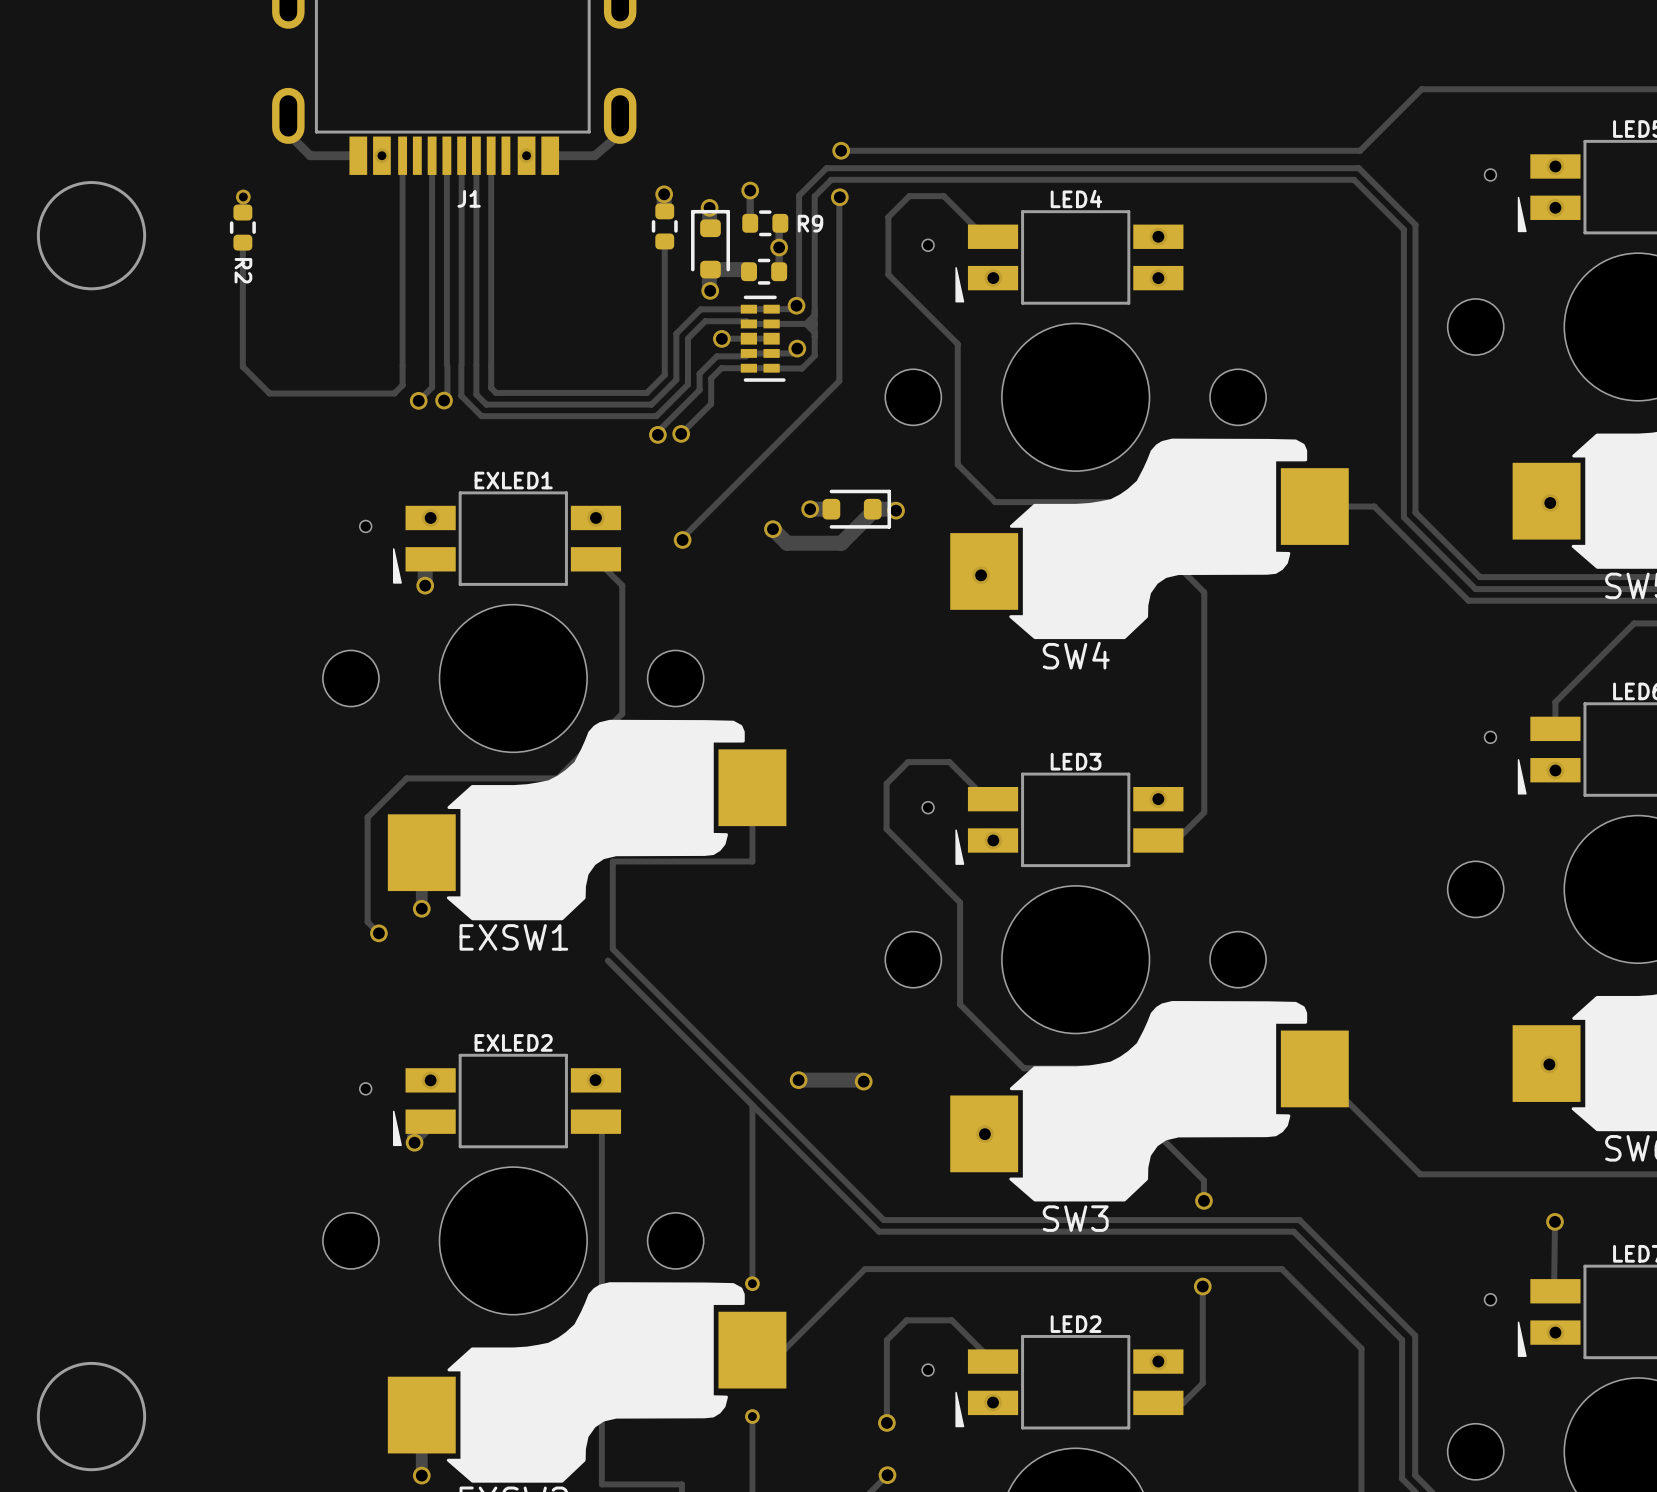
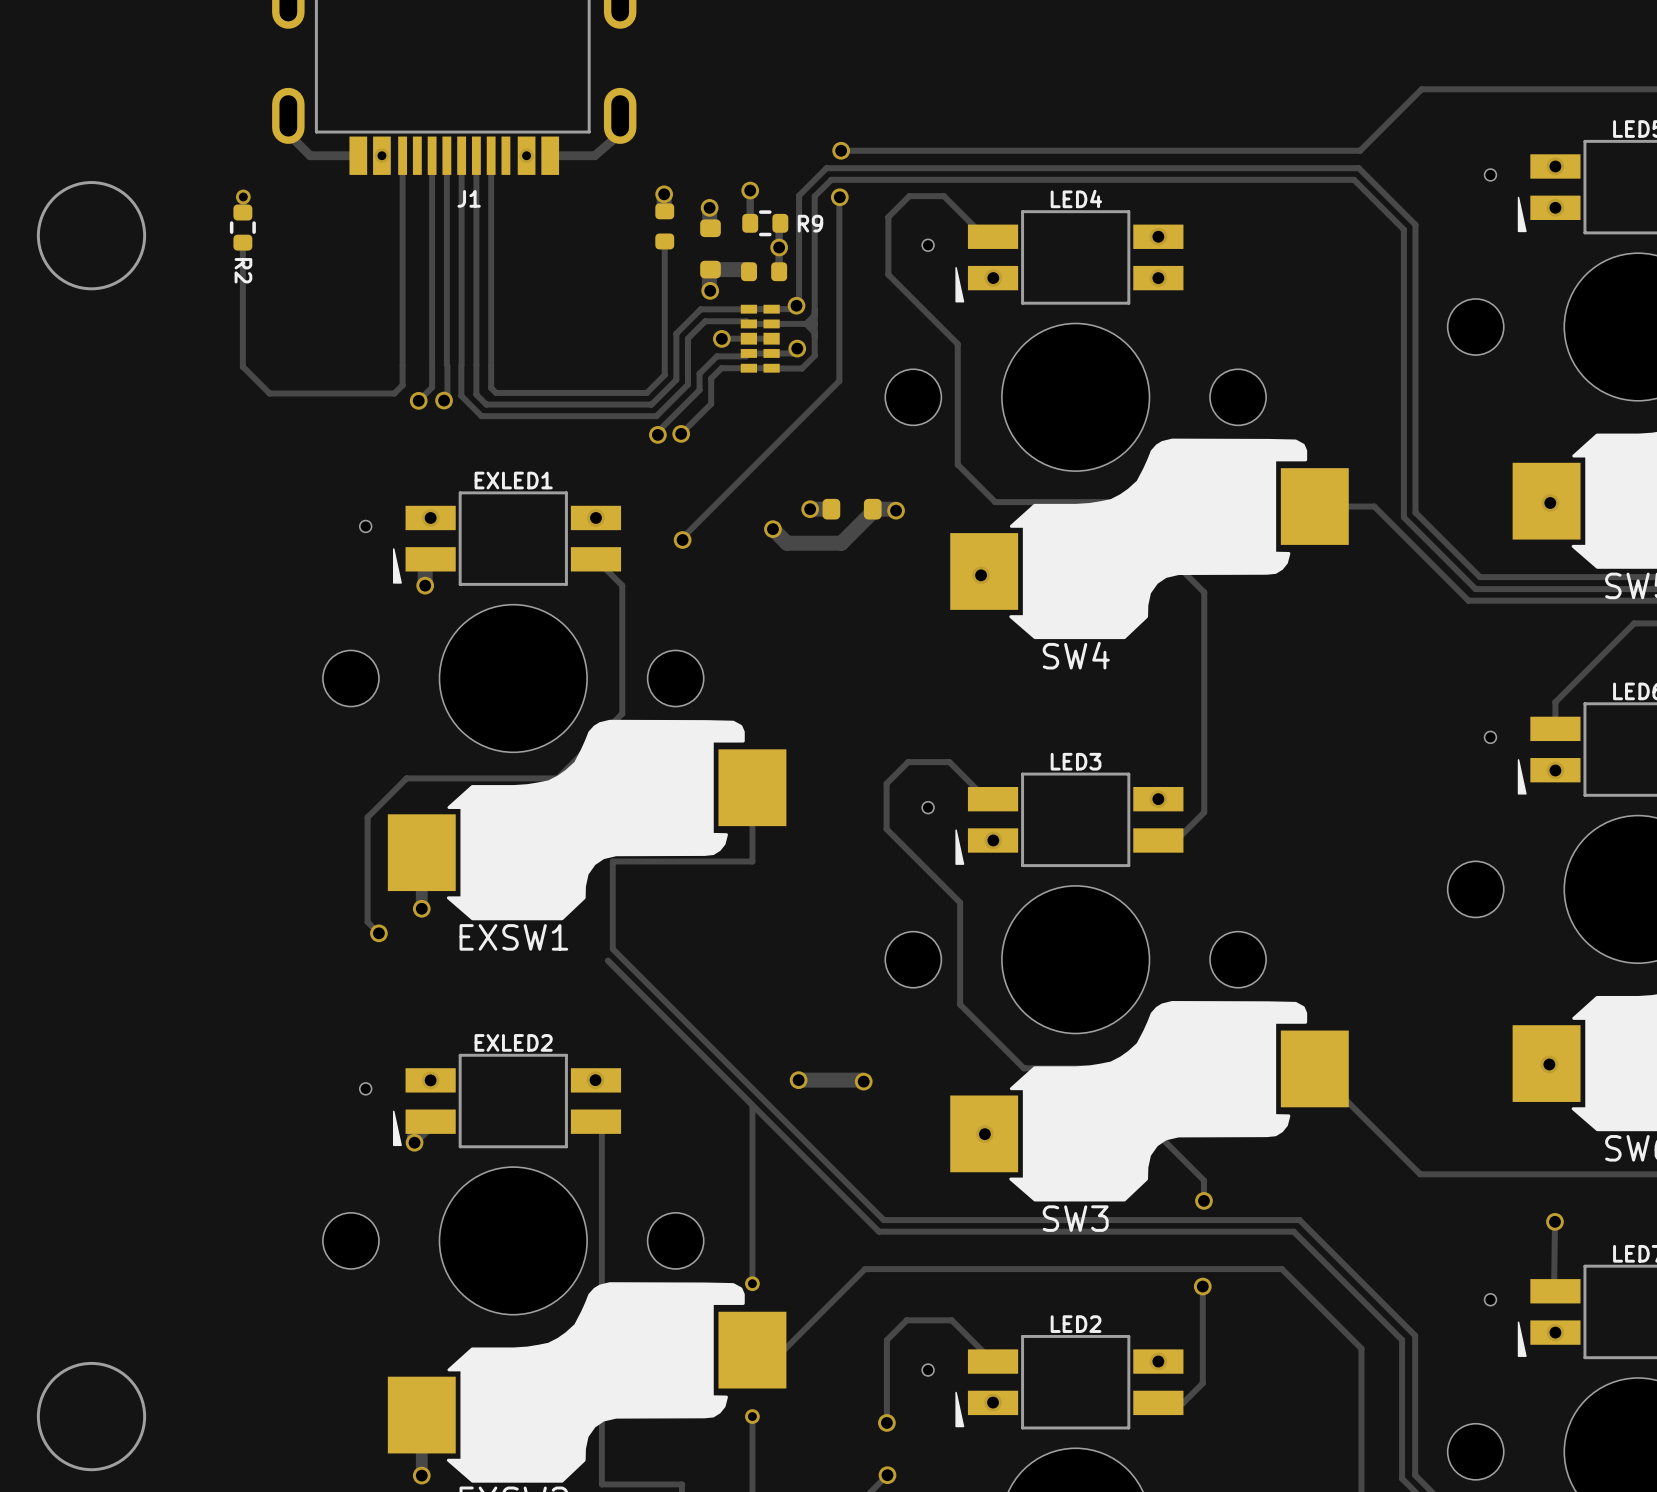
part footprint: [651, 203, 678, 250] -> [655, 203, 675, 250]
part footprint: [691, 209, 730, 279] -> [700, 219, 721, 279]
part footprint: [741, 258, 788, 285] -> [741, 262, 788, 282]
part footprint: [740, 295, 786, 382] -> [740, 304, 780, 373]
part footprint: [822, 489, 892, 529] -> [822, 498, 882, 520]

